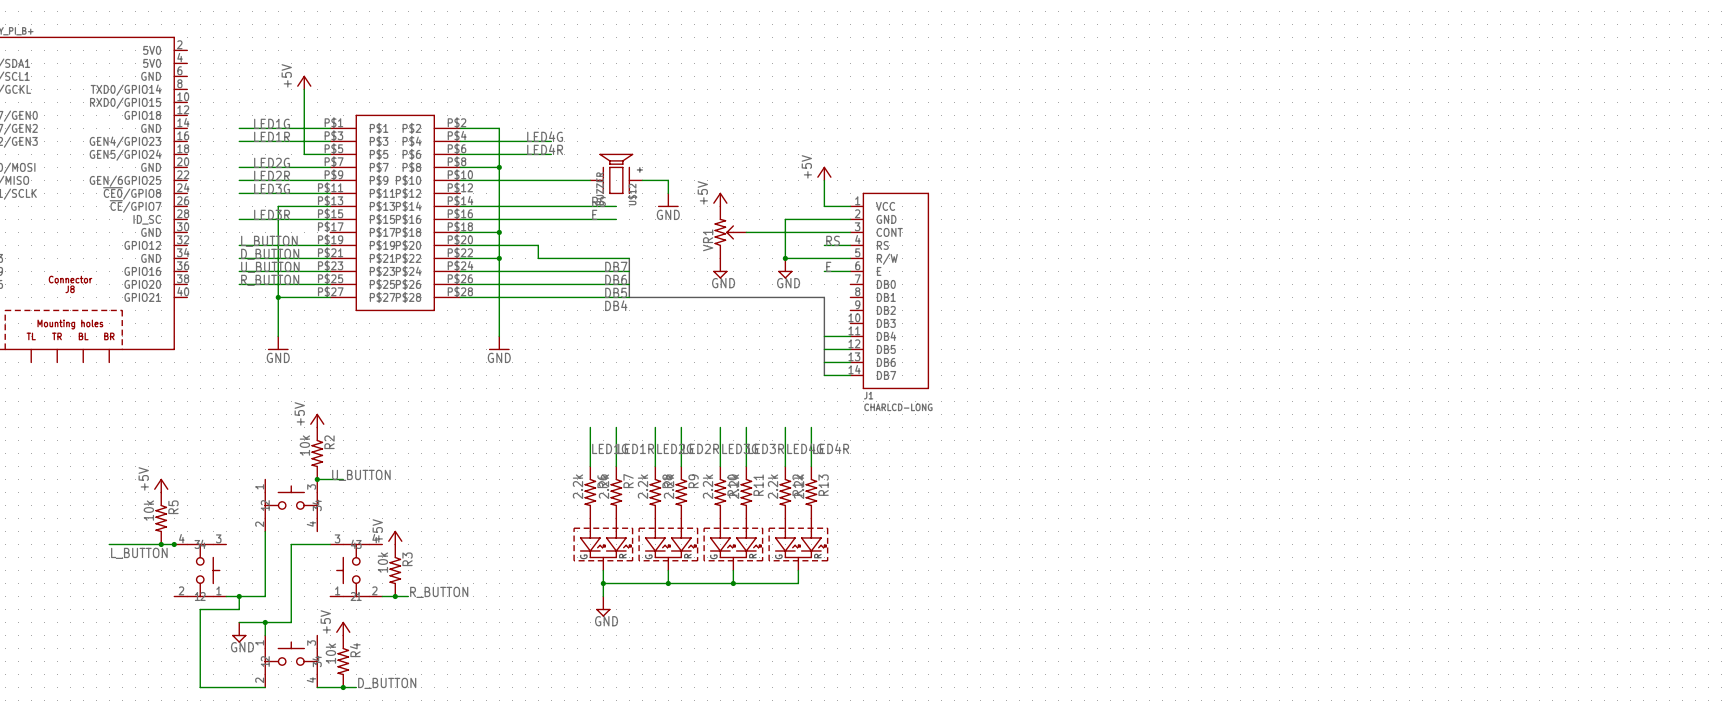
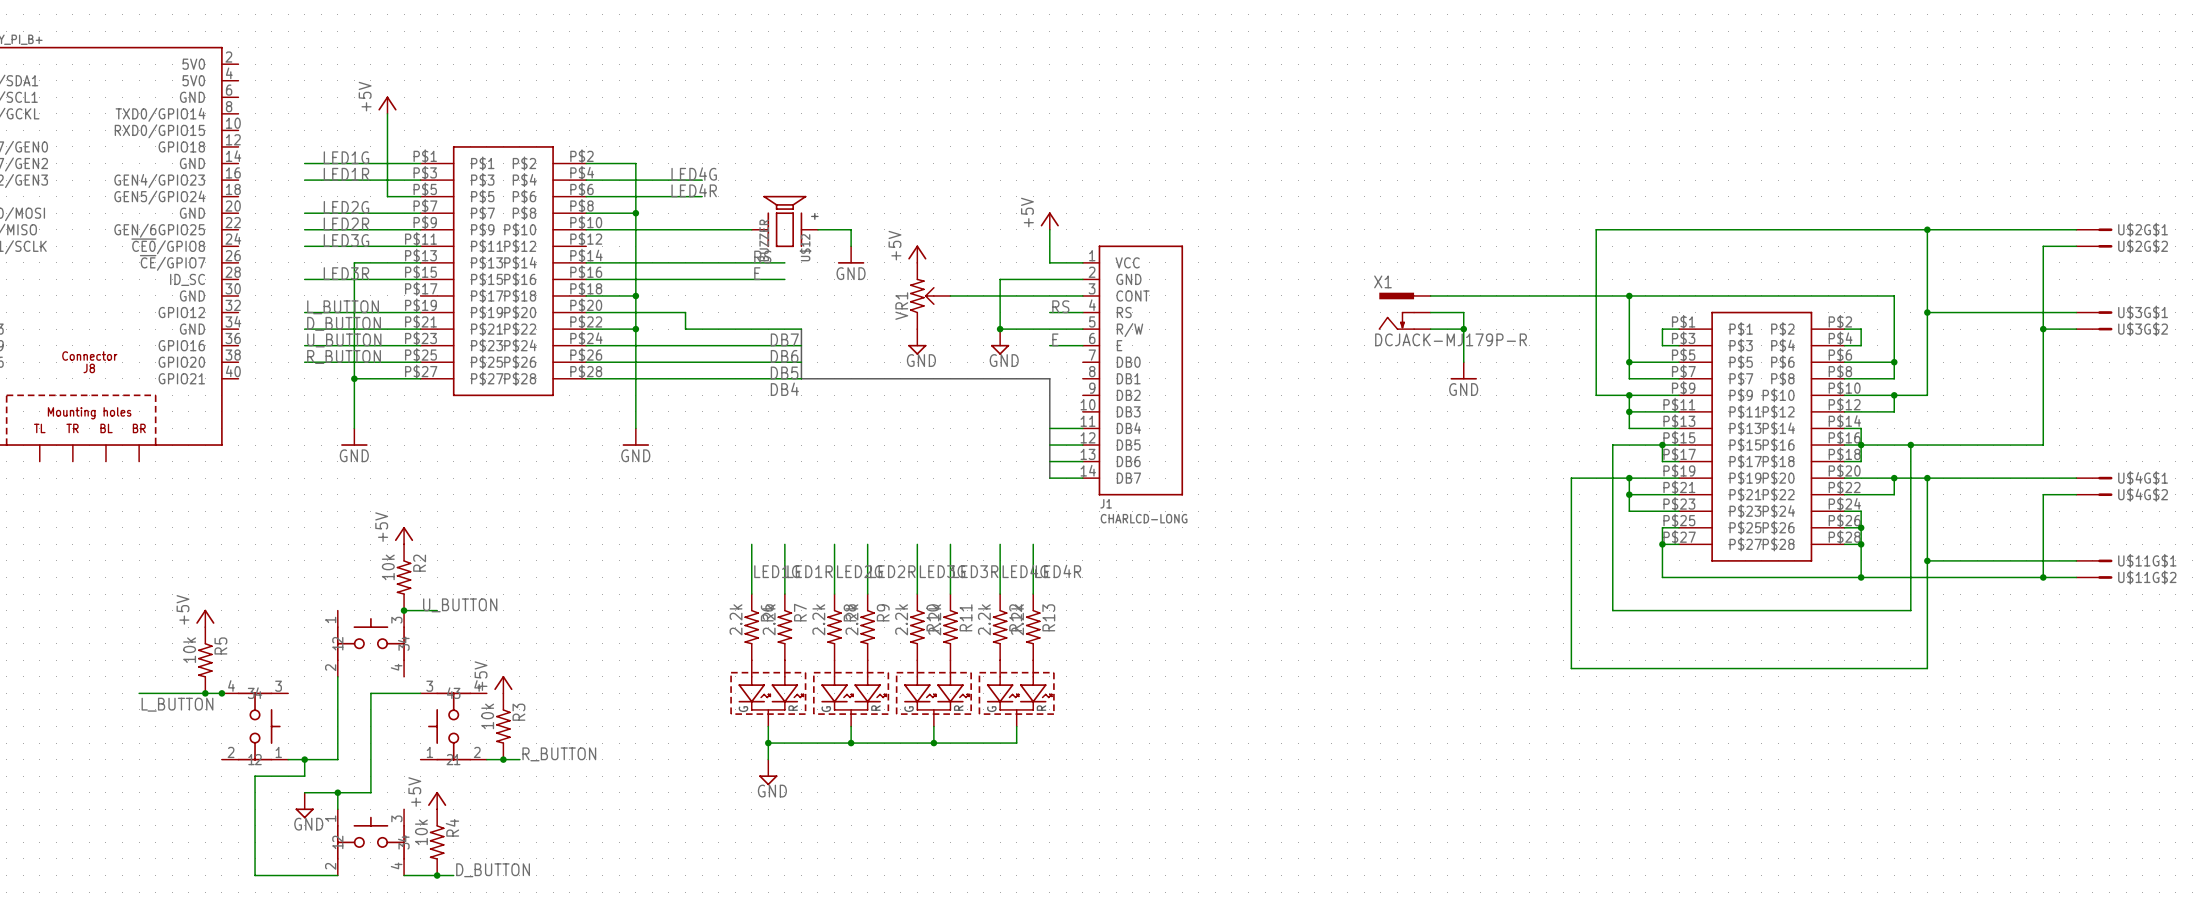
wire: none -> (1927, 229) (1927, 395) (1844, 395)
junction: none -> (1927, 229)
wire: none -> (2076, 229) (1596, 229) (1596, 395) (1679, 395)
U$2G$1: none -> (2094, 229)
wire: none -> (2076, 246) (2043, 246) (2043, 445) (1844, 445)
U$2G$2: none -> (2094, 246)
wire: none -> (1430, 295) (1894, 295) (1894, 378) (1844, 378)
wire: none -> (1629, 295) (1629, 378) (1679, 378)
junction: none -> (1629, 295)
X1: none -> DCJACK-MJ179P-R (1404, 311)
wire: none -> (1430, 312) (1463, 312) (1463, 362)
wire: none -> (1927, 312) (2076, 312)
junction: none -> (1927, 312)
U$3G$1: none -> (2094, 312)
wire: none -> (1430, 329) (1463, 329)
junction: none -> (1463, 329)
wire: none -> (1679, 329) (1662, 329) (1662, 345) (1679, 345)
wire: none -> (1844, 329) (1861, 329) (1861, 345) (1844, 345)
wire: none -> (2043, 329) (2076, 329)
junction: none -> (2043, 329)
U$3G$2: none -> (2094, 329)
wire: none -> (1629, 362) (1679, 362)
junction: none -> (1629, 362)
wire: none -> (1844, 362) (1894, 362)
junction: none -> (1894, 362)
power symbol: none -> GND (1463, 370)
wire: none -> (1629, 395) (1629, 428) (1679, 428)
junction: none -> (1629, 395)
wire: none -> (1894, 395) (1894, 411) (1844, 411)
junction: none -> (1894, 395)
wire: none -> (1629, 411) (1679, 411)
junction: none -> (1629, 411)
wire: none -> (1844, 428) (1861, 428) (1861, 461) (1844, 461)
part: none -> (1761, 436)
wire: none -> (1662, 445) (1662, 461) (1679, 461)
junction: none -> (1662, 445)
wire: none -> (1679, 445) (1612, 445) (1612, 610) (1910, 610) (1910, 445)
junction: none -> (1861, 445)
junction: none -> (1910, 445)
wire: none -> (1629, 478) (1629, 511) (1679, 511)
junction: none -> (1629, 478)
wire: none -> (1679, 478) (1571, 478) (1571, 668) (1927, 668) (1927, 478)
wire: none -> (1844, 478) (2076, 478)
wire: none -> (1894, 478) (1894, 494) (1844, 494)
junction: none -> (1894, 478)
junction: none -> (1927, 478)
U$4G$1: none -> (2094, 478)
wire: none -> (1629, 494) (1679, 494)
junction: none -> (1629, 494)
wire: none -> (2076, 494) (2043, 494) (2043, 577)
U$4G$2: none -> (2094, 494)
wire: none -> (1844, 511) (1861, 511) (1861, 577)
wire: none -> (1679, 527) (1662, 527) (1662, 577) (2076, 577)
wire: none -> (1844, 527) (1861, 527)
junction: none -> (1861, 527)
wire: none -> (1662, 544) (1679, 544)
junction: none -> (1662, 544)
wire: none -> (1844, 544) (1861, 544)
junction: none -> (1861, 544)
wire: none -> (1927, 560) (2076, 560)
junction: none -> (1927, 560)
U$11G$1: none -> (2094, 560)
junction: none -> (1861, 577)
junction: none -> (2043, 577)
U$11G$2: none -> (2094, 577)

